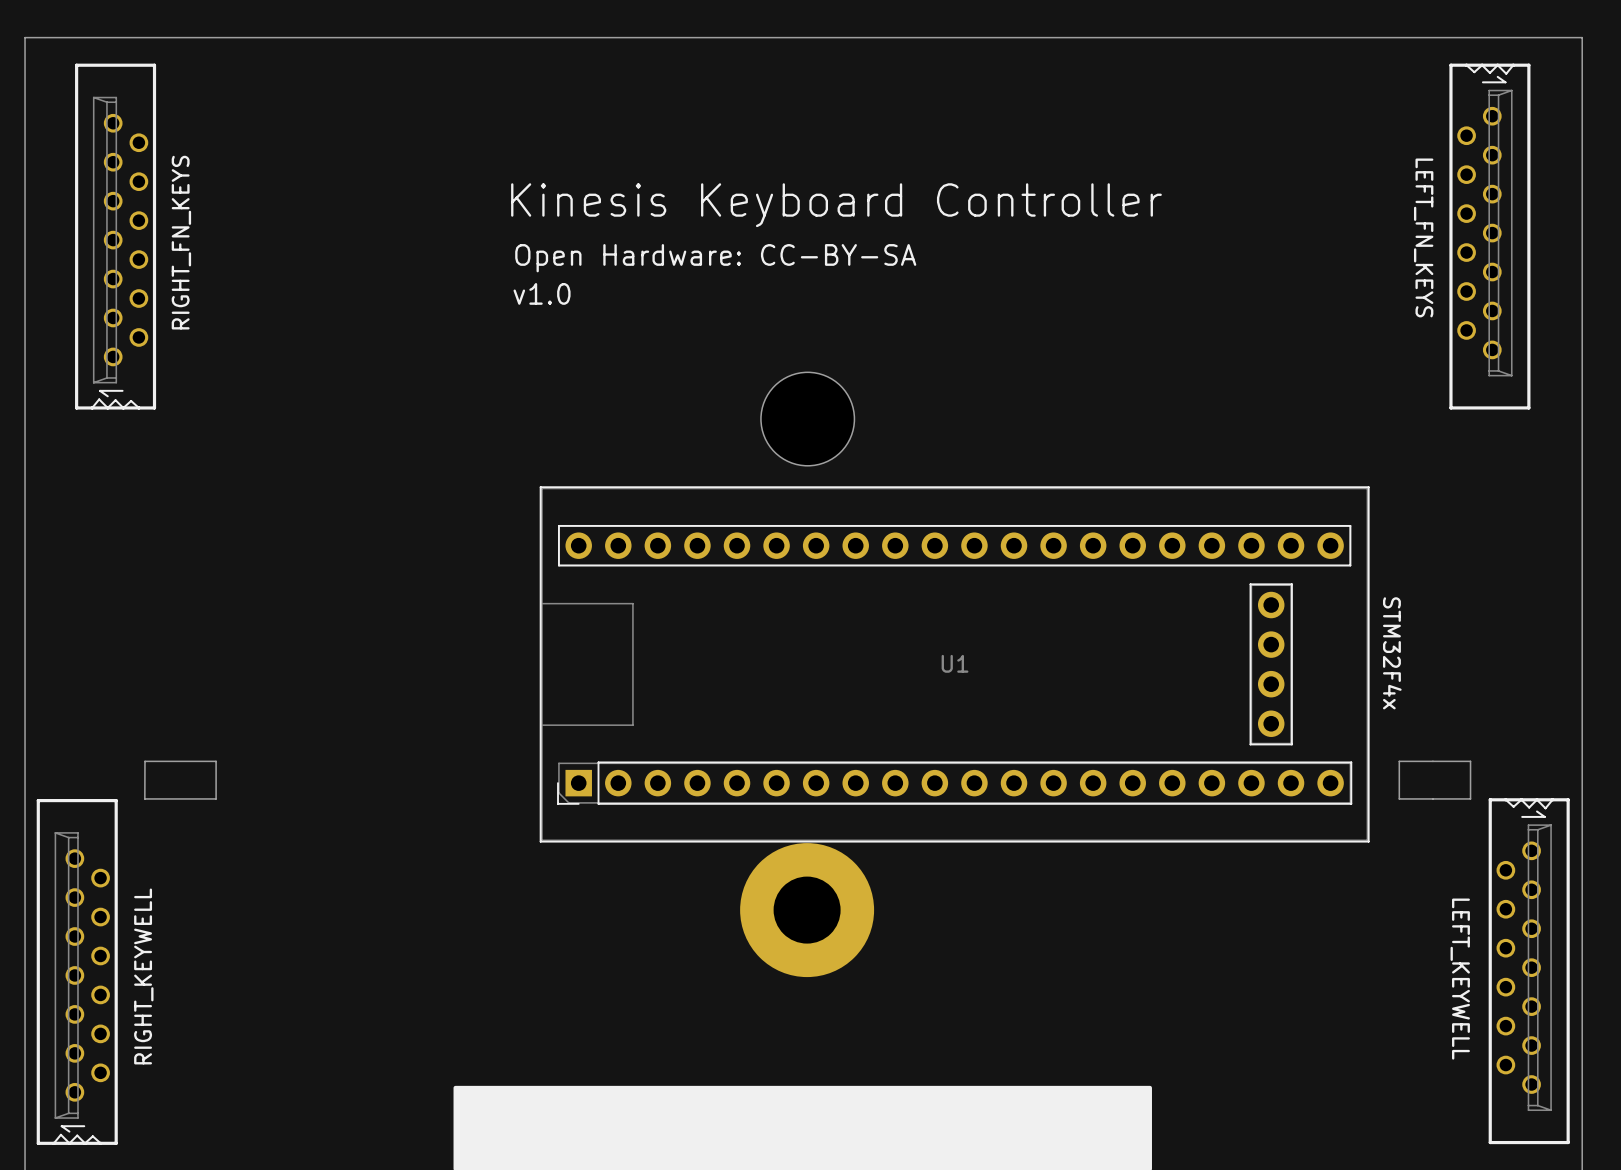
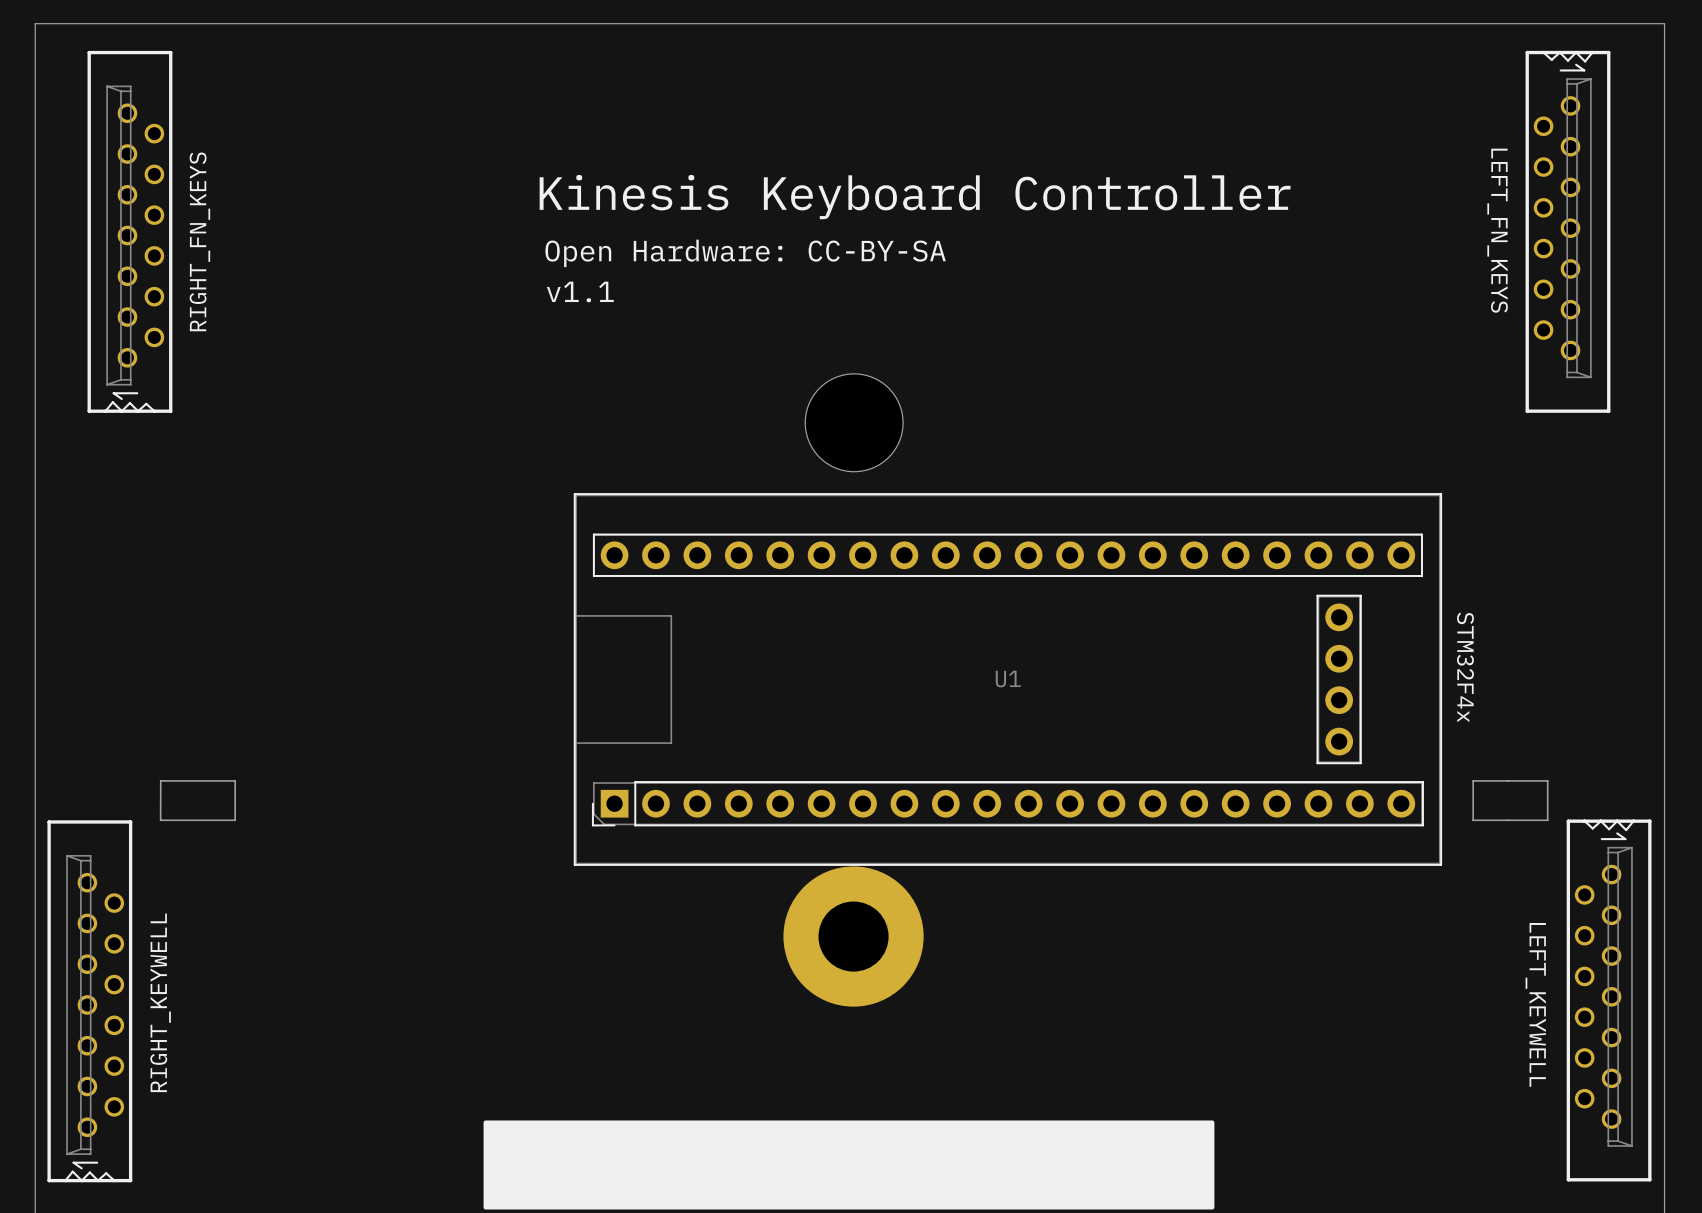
text: v1.0 (542, 293) -> v1.1 (580, 291)

